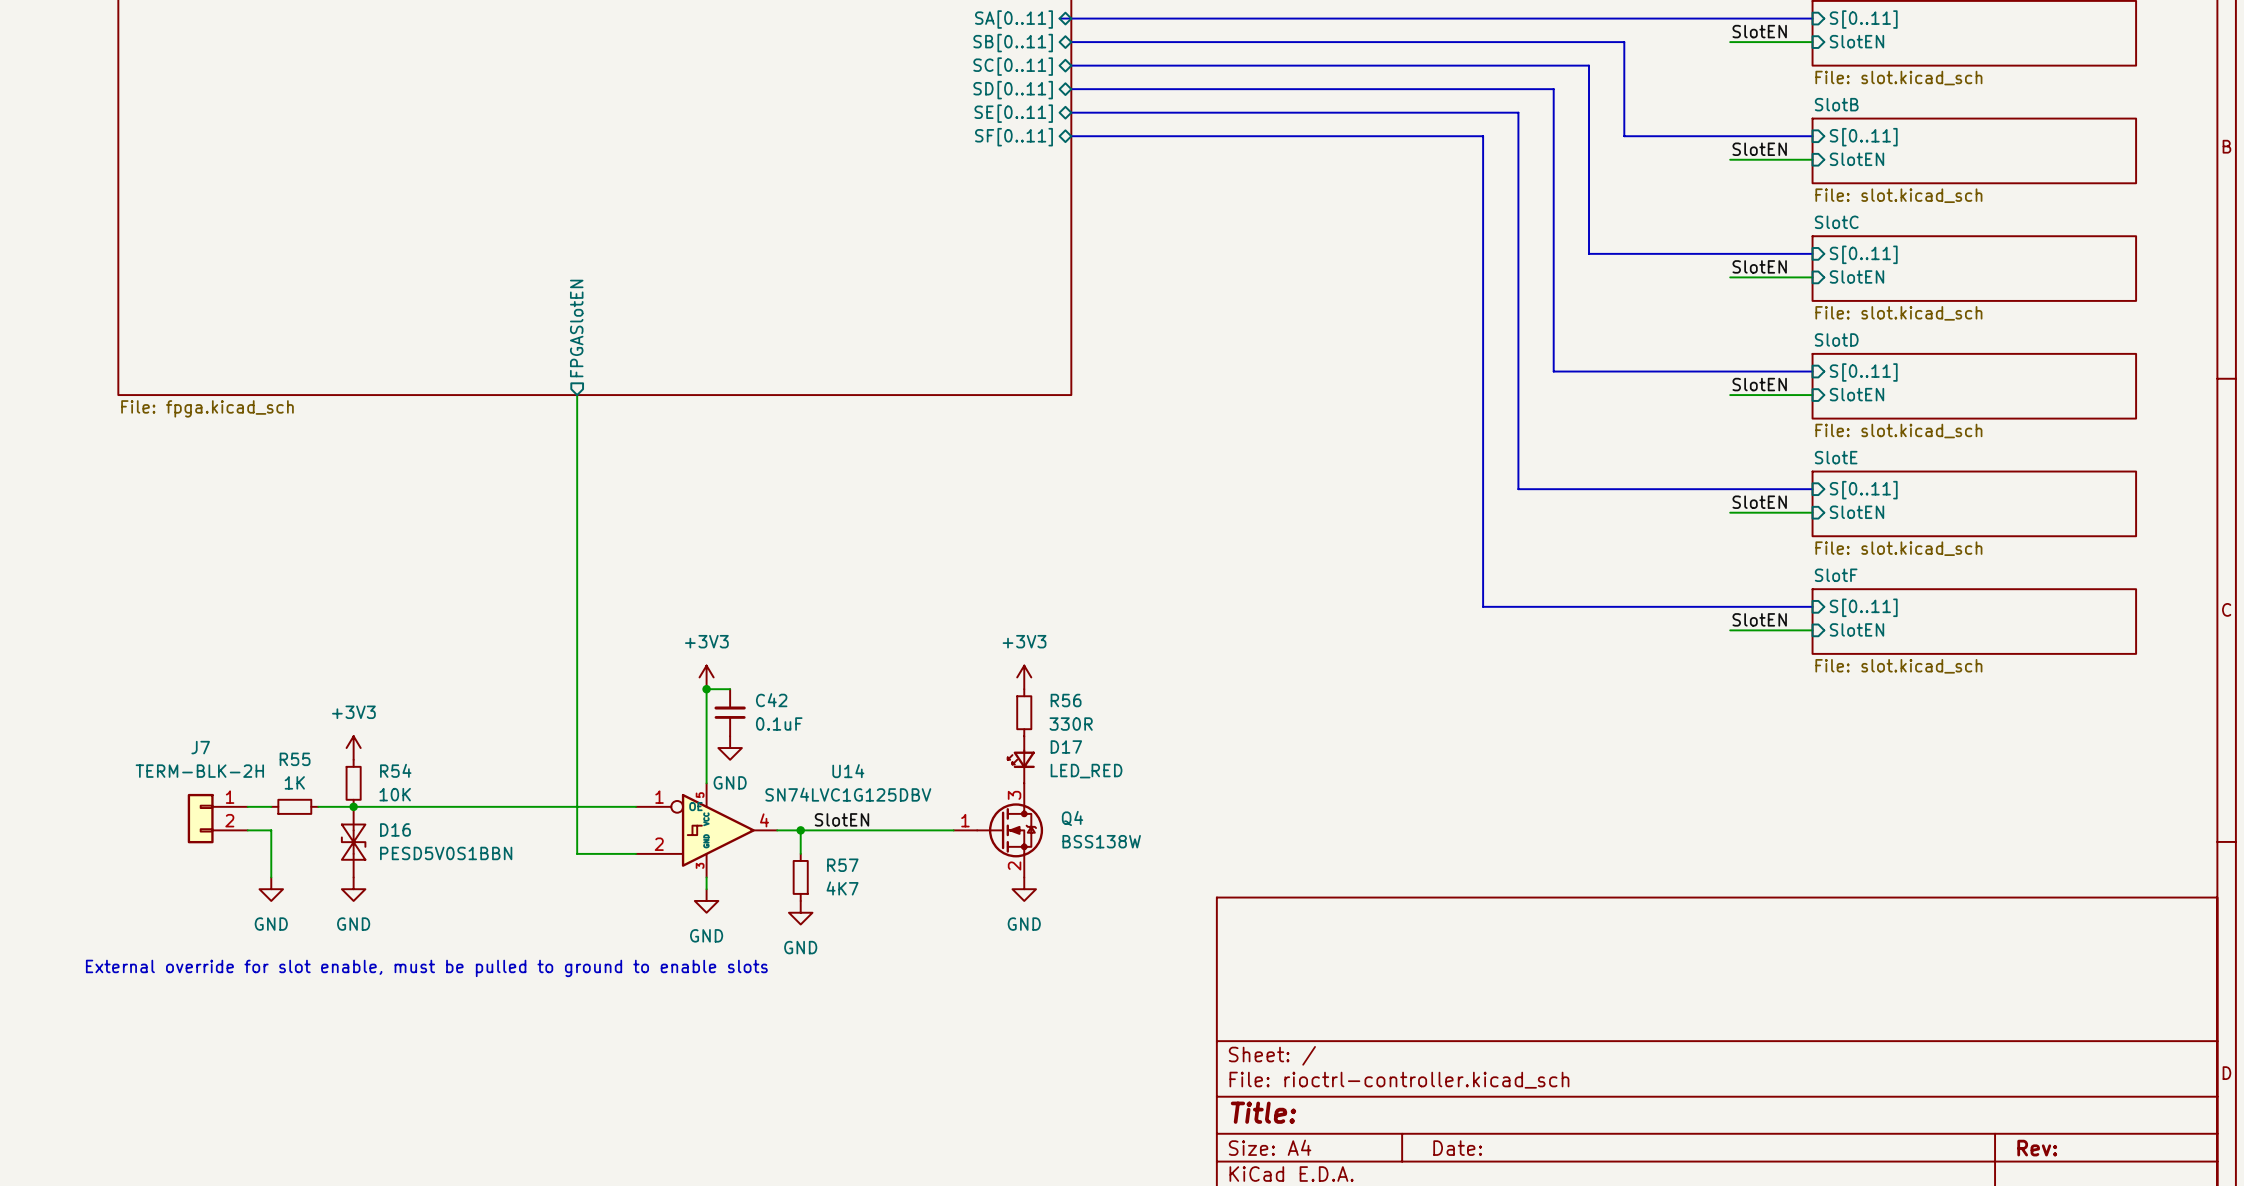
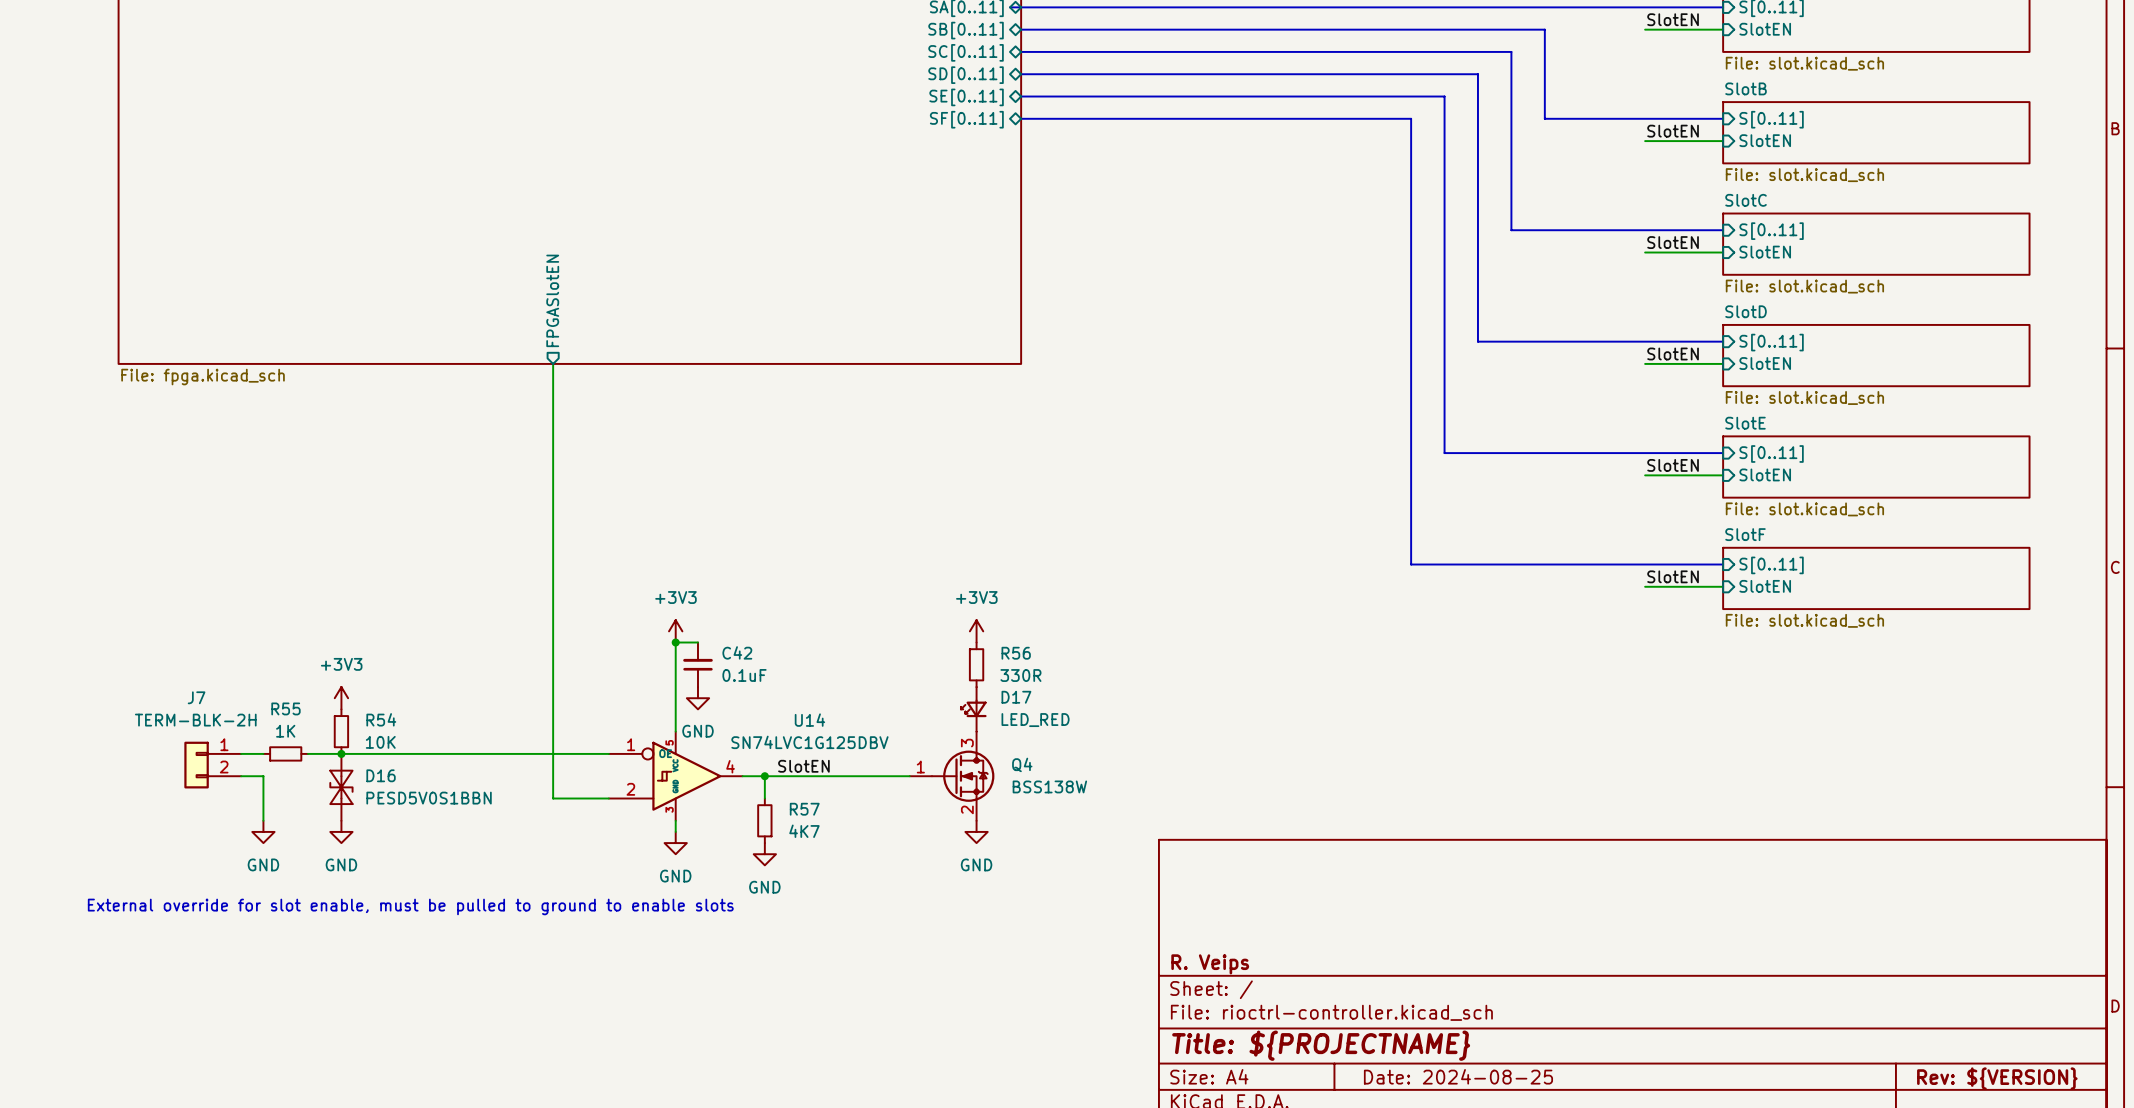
title block: none -> R. Veips (1210, 964)
title block: Title: (1263, 1112) -> Title: ${PROJECTNAME} (1321, 1045)
title block: Date: (1457, 1148) -> Date: 2024-08-25 (1458, 1076)
title block: Rev: (2037, 1148) -> Rev: ${VERSION} (1997, 1078)

